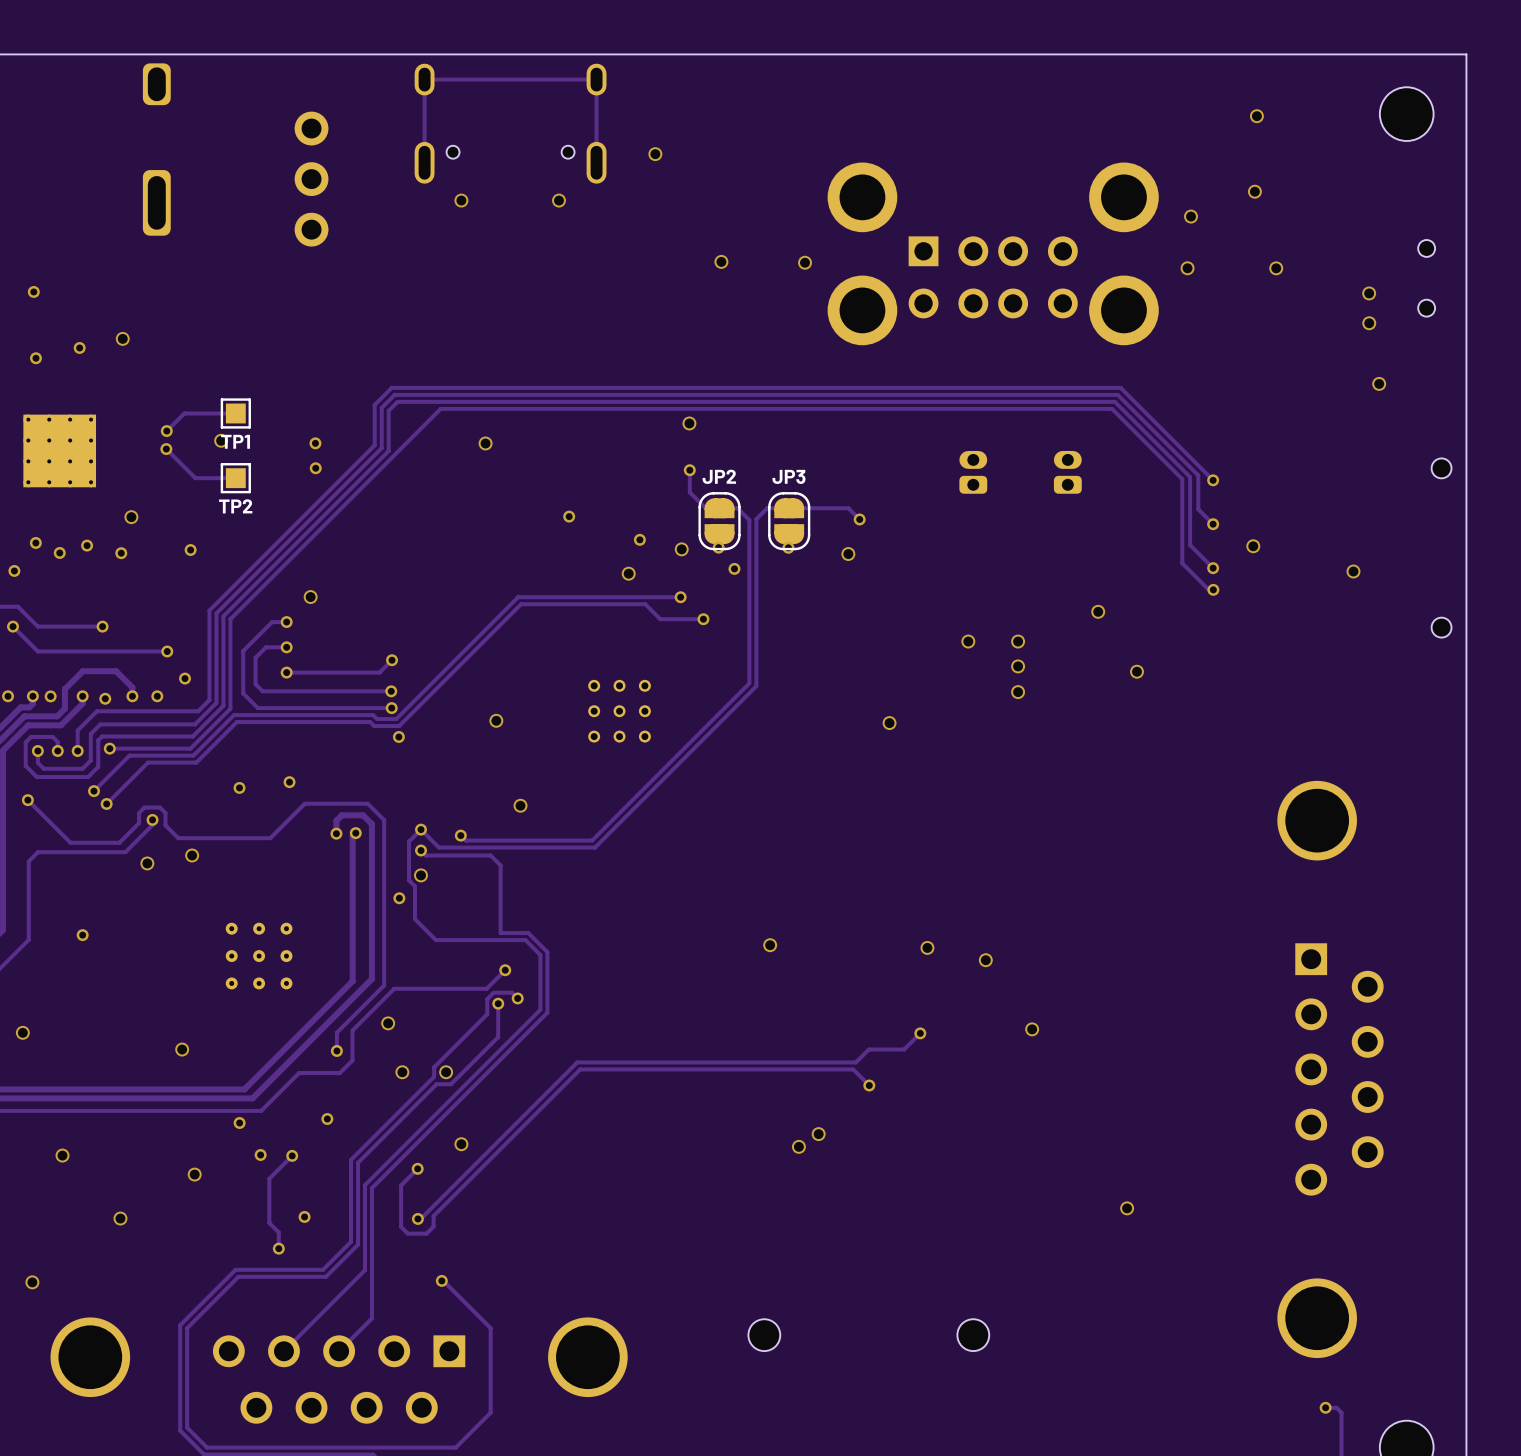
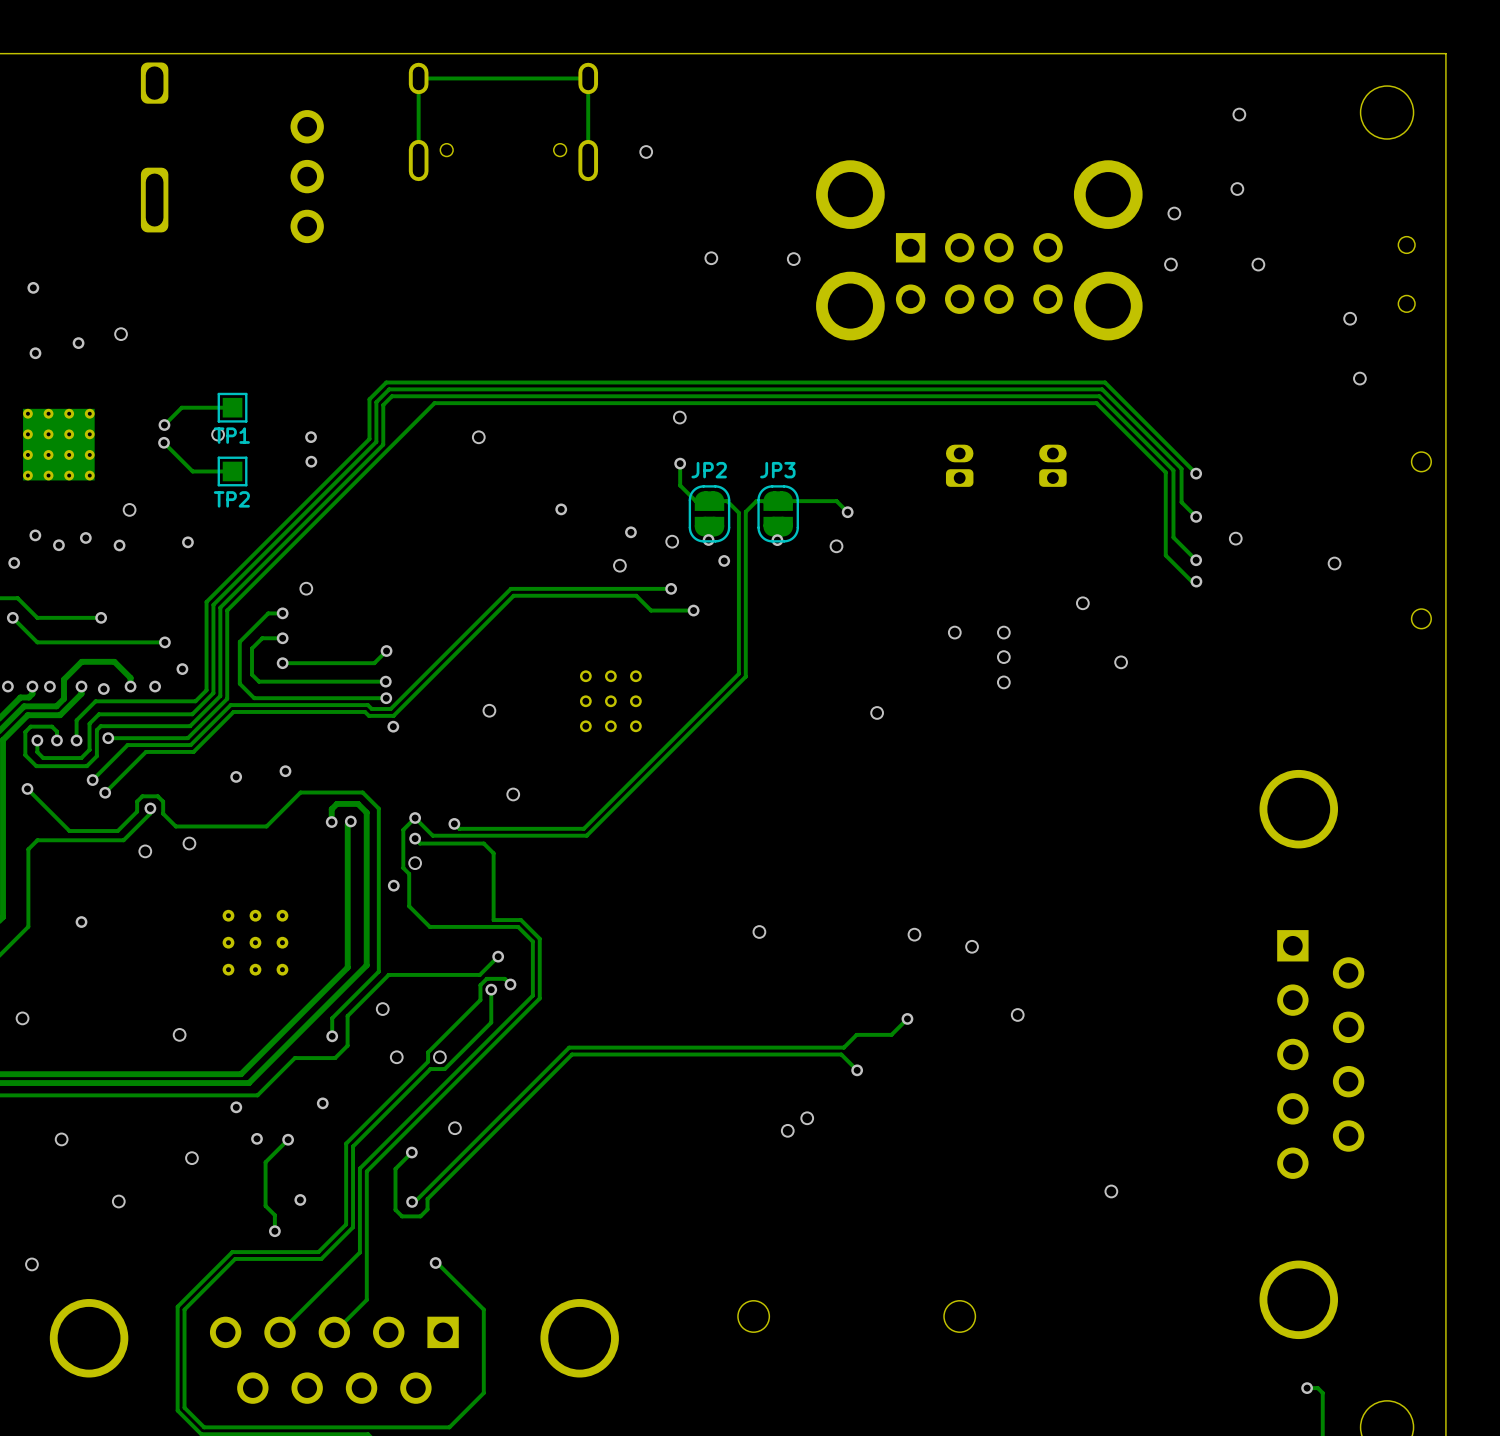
via: (461, 200) -> none
via: (558, 200) -> none
via: (1369, 293) -> none

